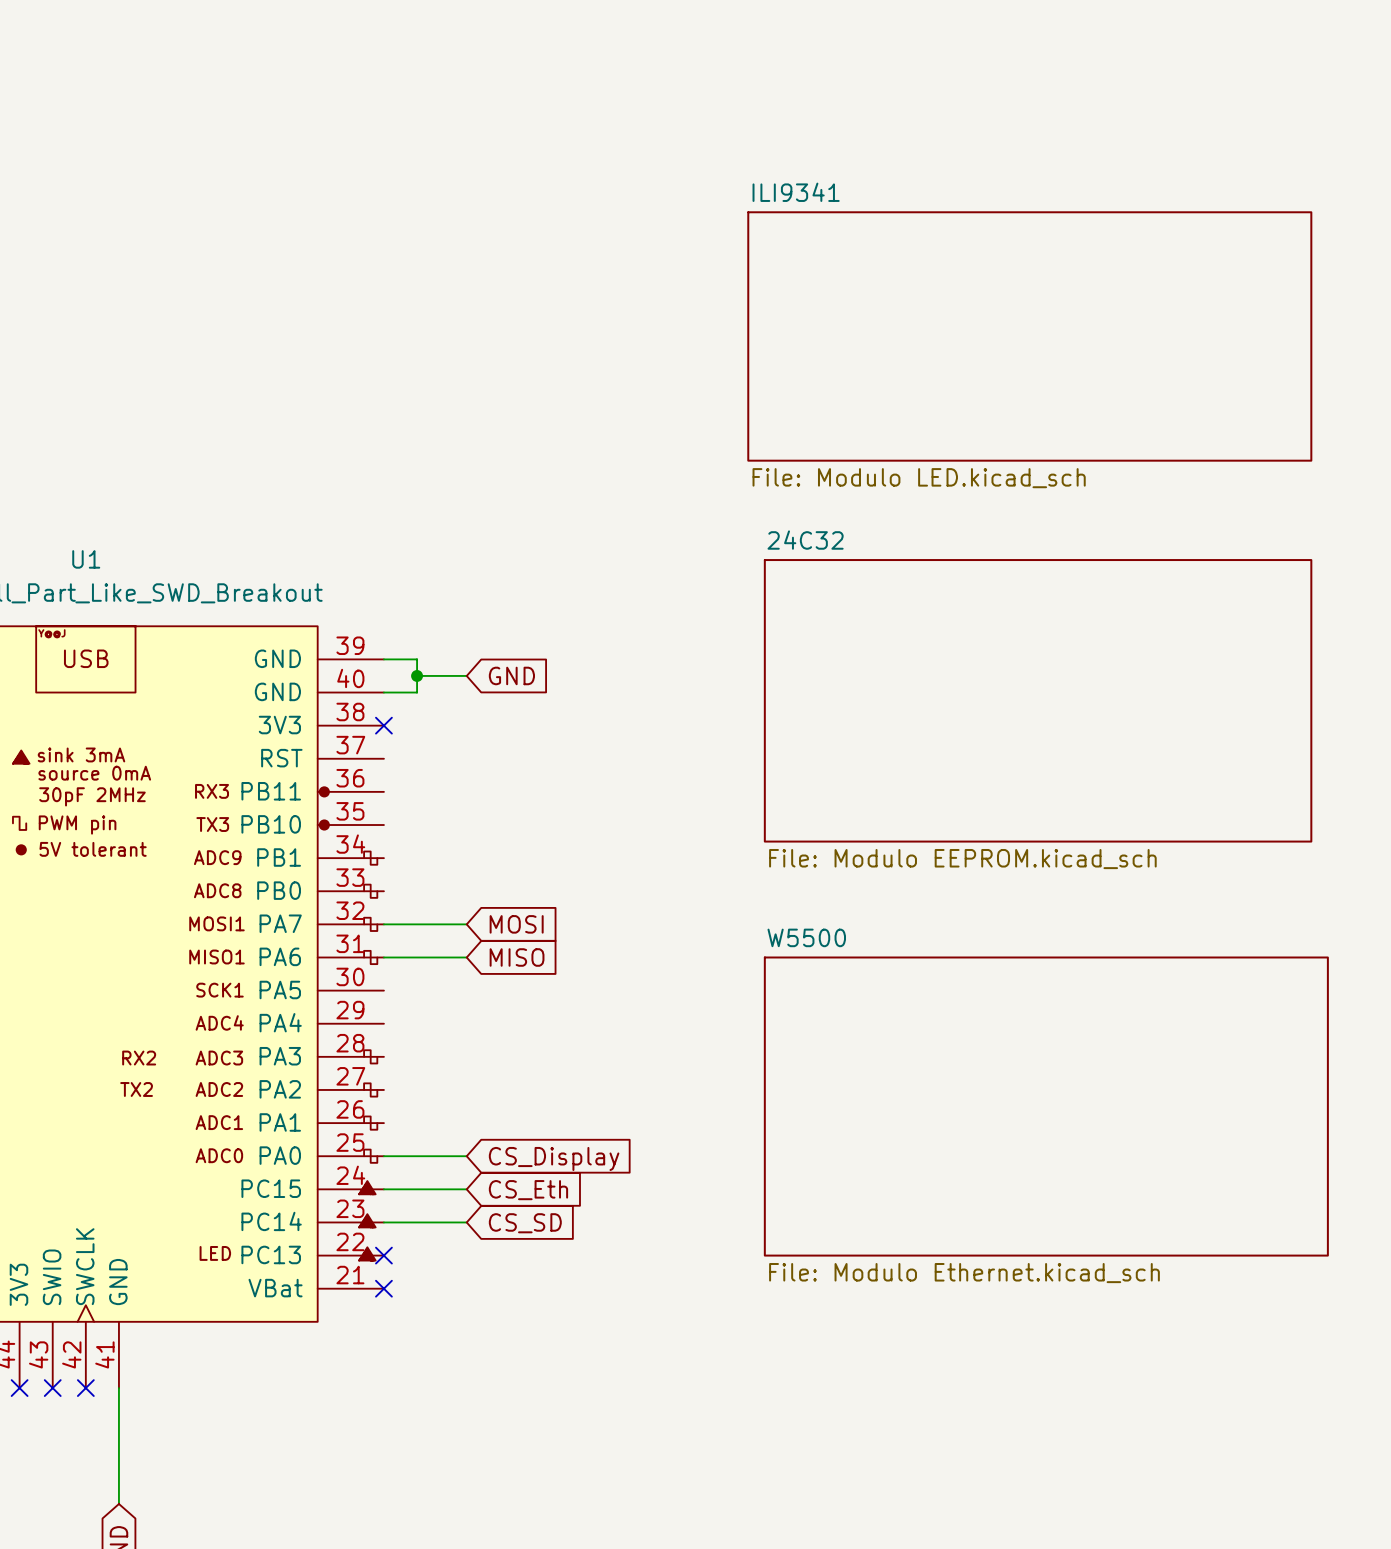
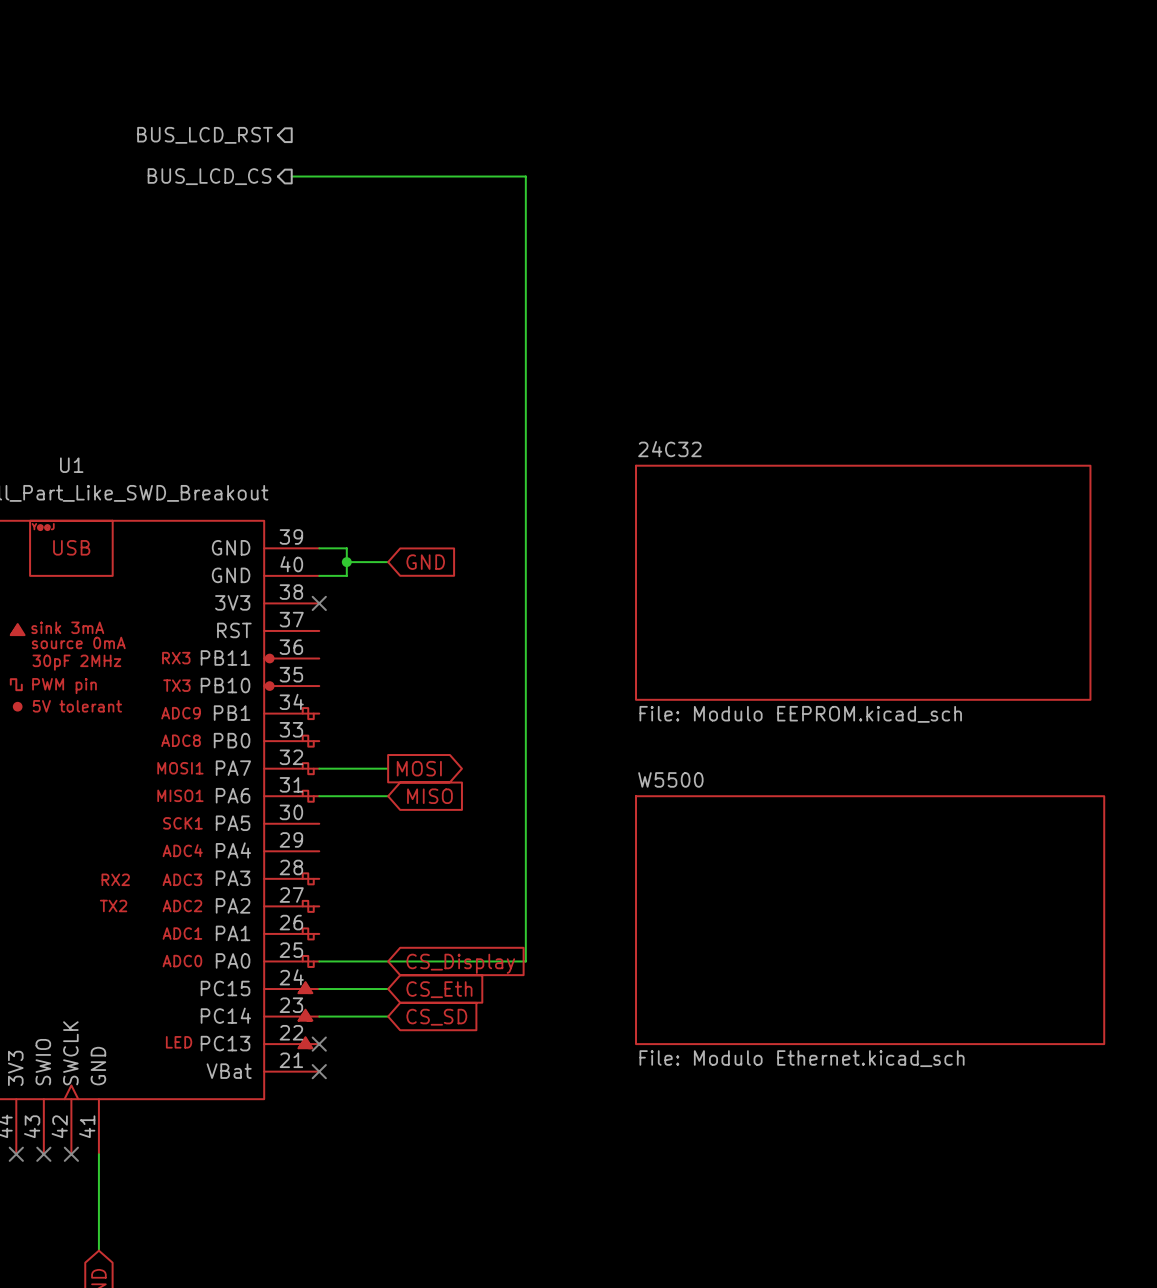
sheet pin: none -> BUS_LCD_RST (204, 135)
sheet pin: none -> BUS_LCD_CS (209, 176)
wire: none -> (291, 176) (525, 176) (525, 961) (388, 961)
sheet ILI9341: File: Modulo LED.kicad_sch (1029, 336) -> none
global label shape: input (516, 924) -> output (419, 768)

